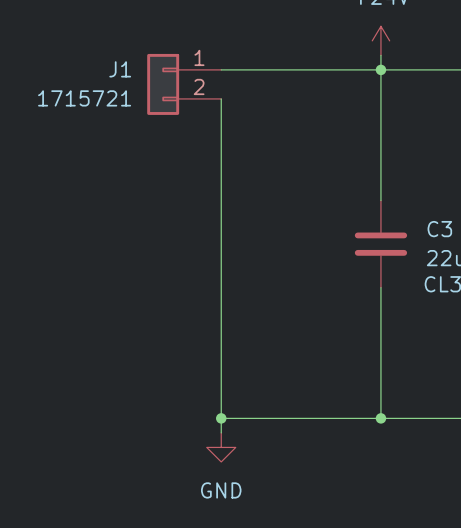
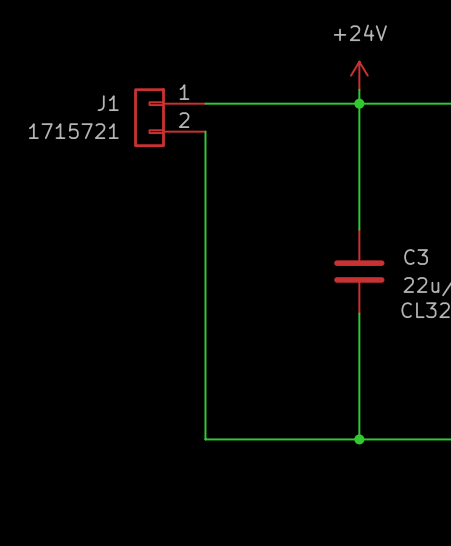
wire: (221, 418) (221, 432) -> none
junction: (221, 418) -> none
power symbol: GND (221, 447) -> none

